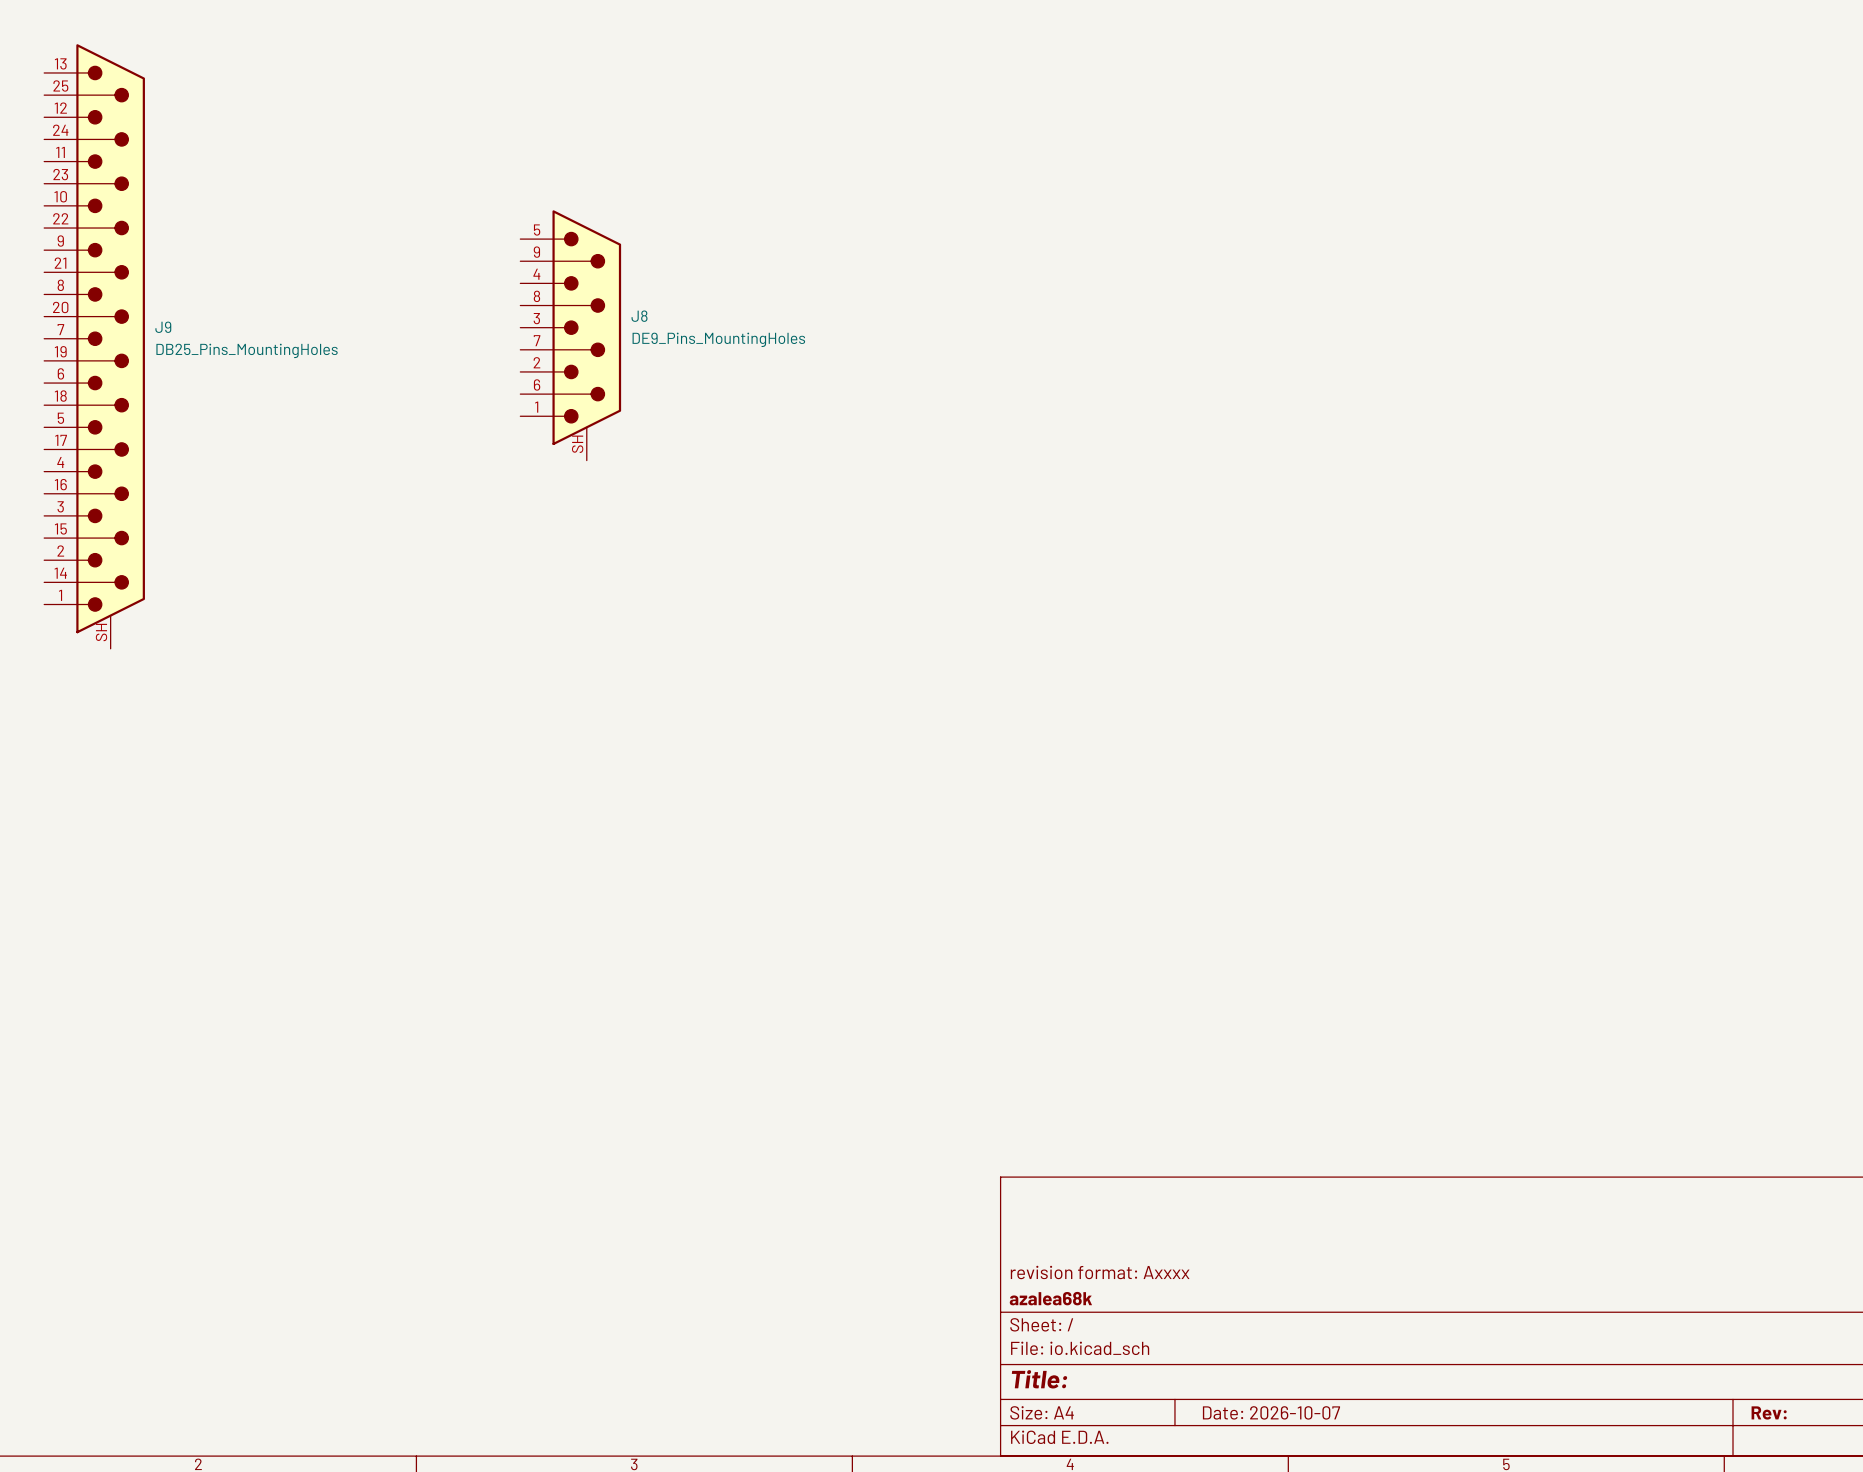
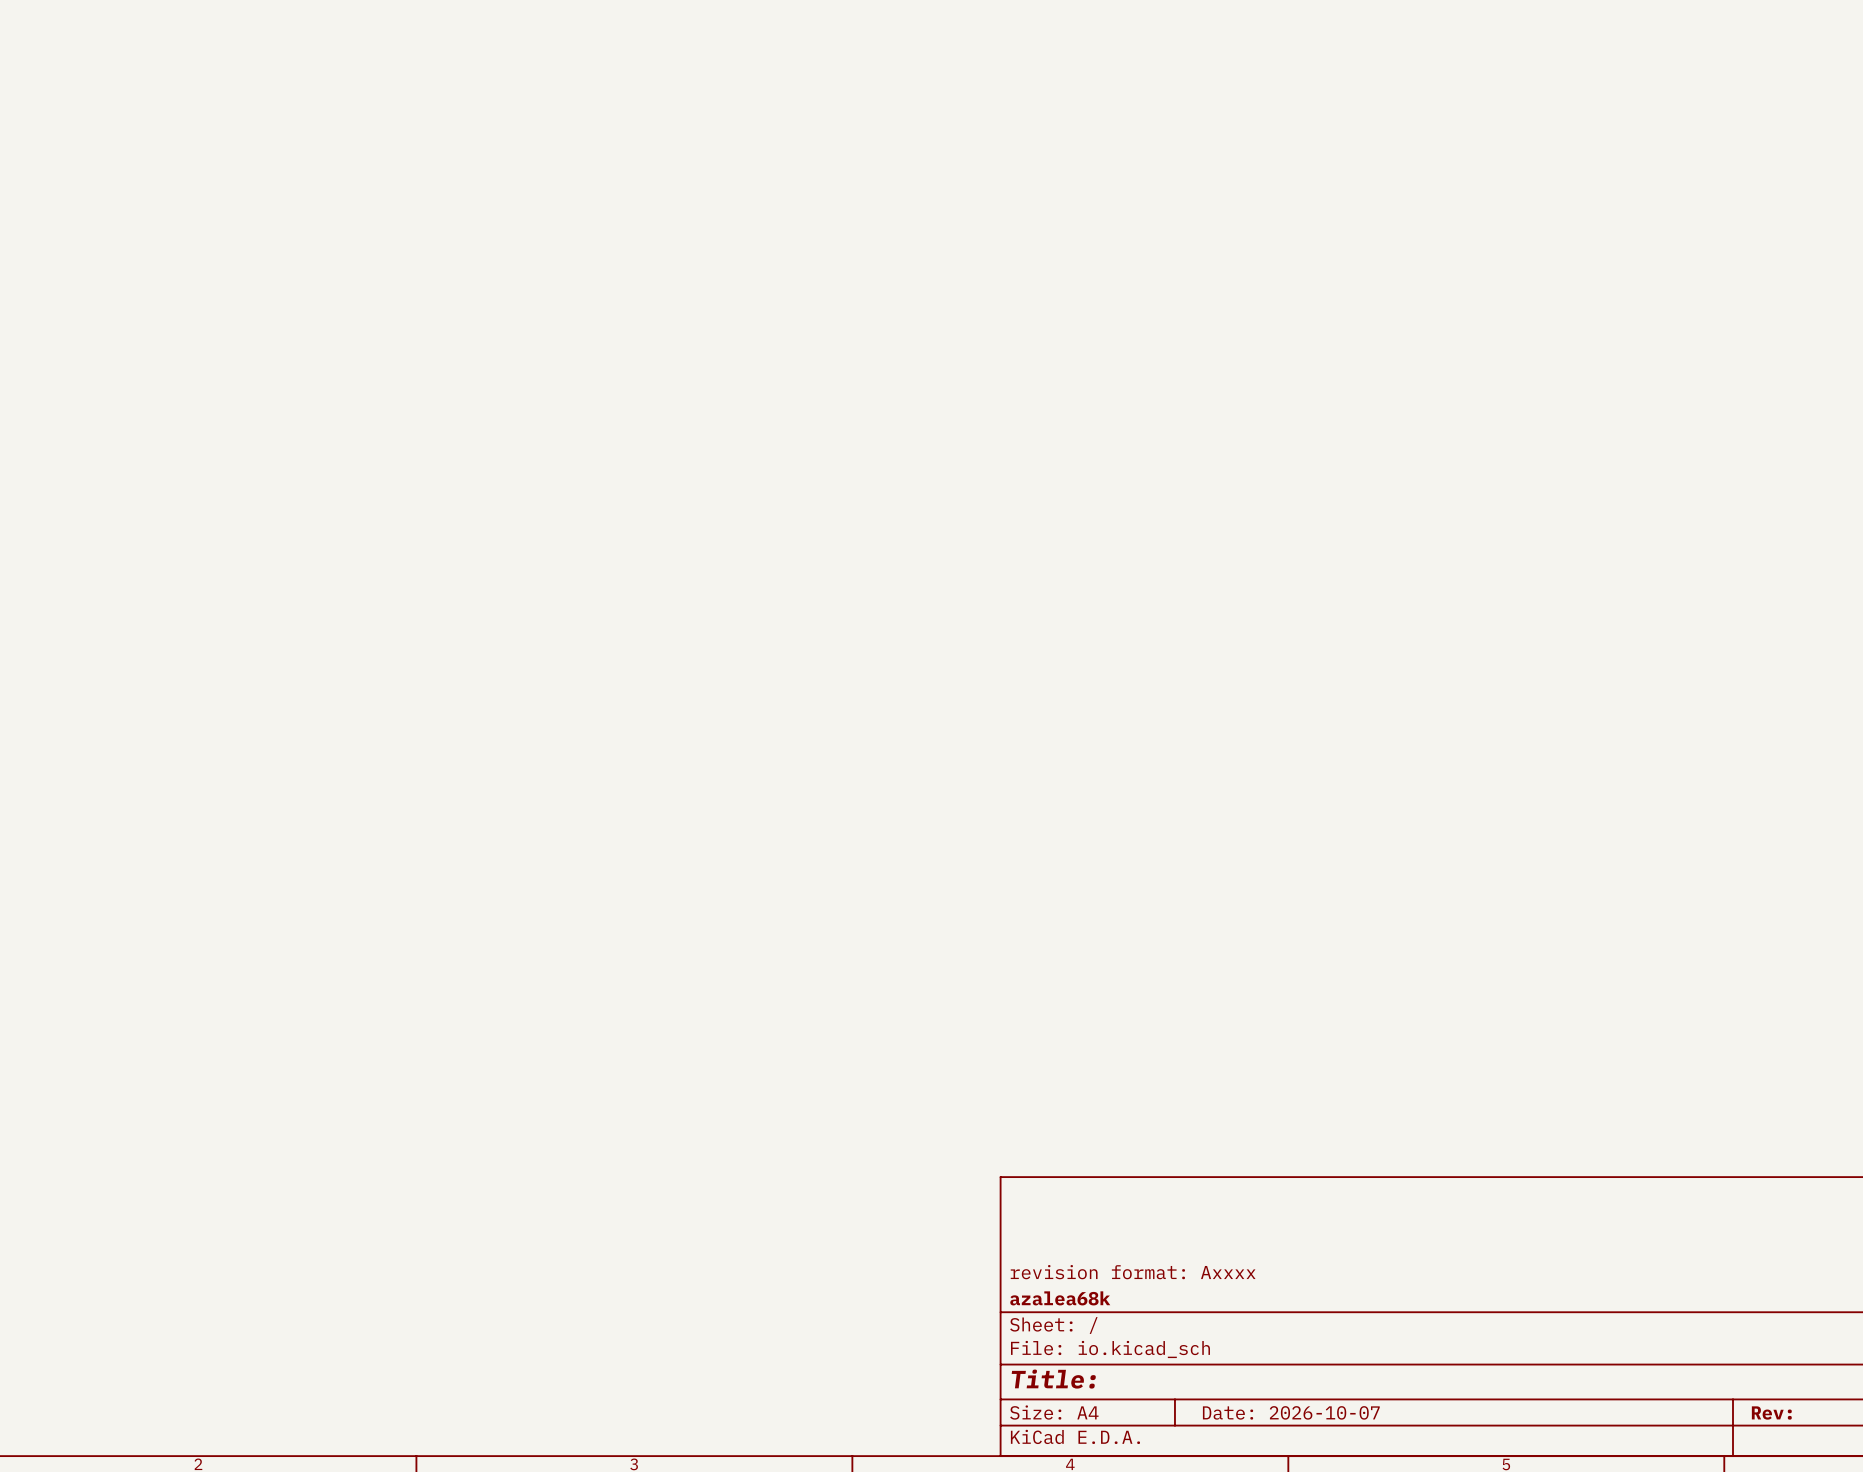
J8: DE9_Pins_MountingHoles (570, 335) -> none
J9: DB25_Pins_MountingHoles (94, 346) -> none

